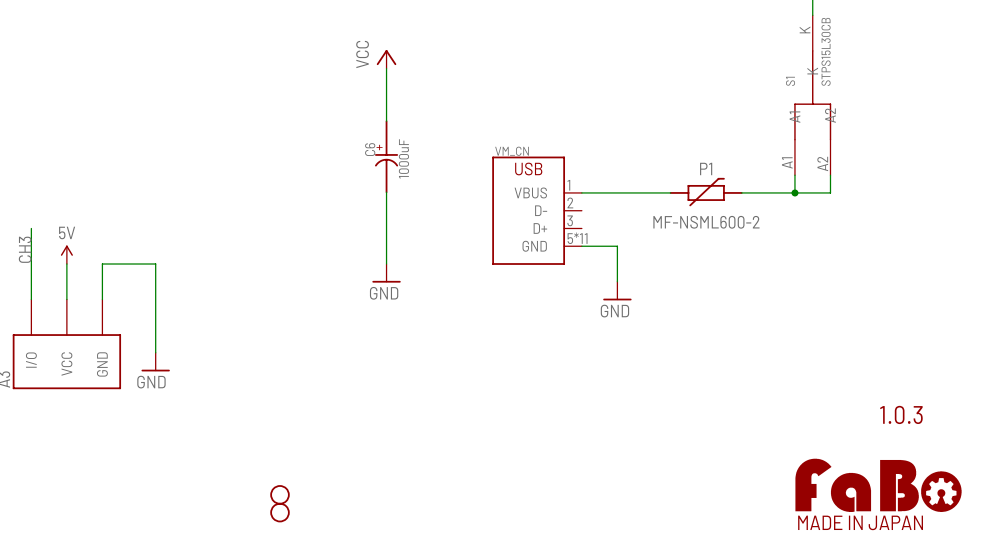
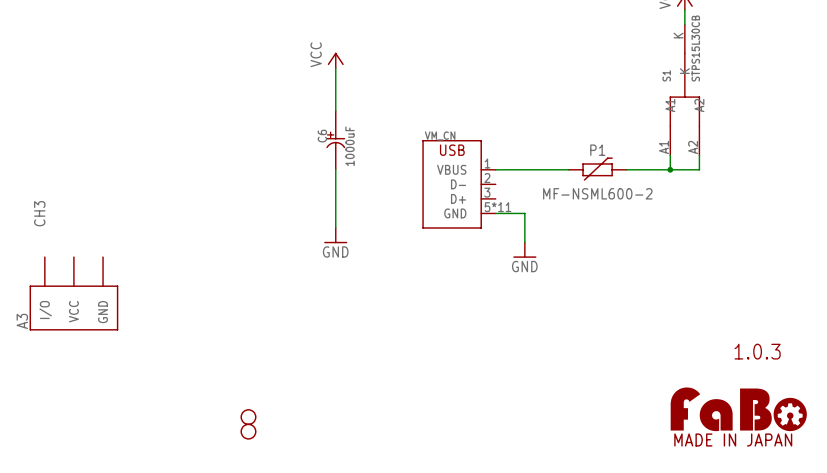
wire: (31, 228) (31, 299) -> none
power symbol: 5V (66, 254) -> none
wire: (66, 264) (66, 299) -> none
wire: (102, 299) (102, 264) (155, 264) (155, 352) -> none
power symbol: GND (155, 362) -> none

